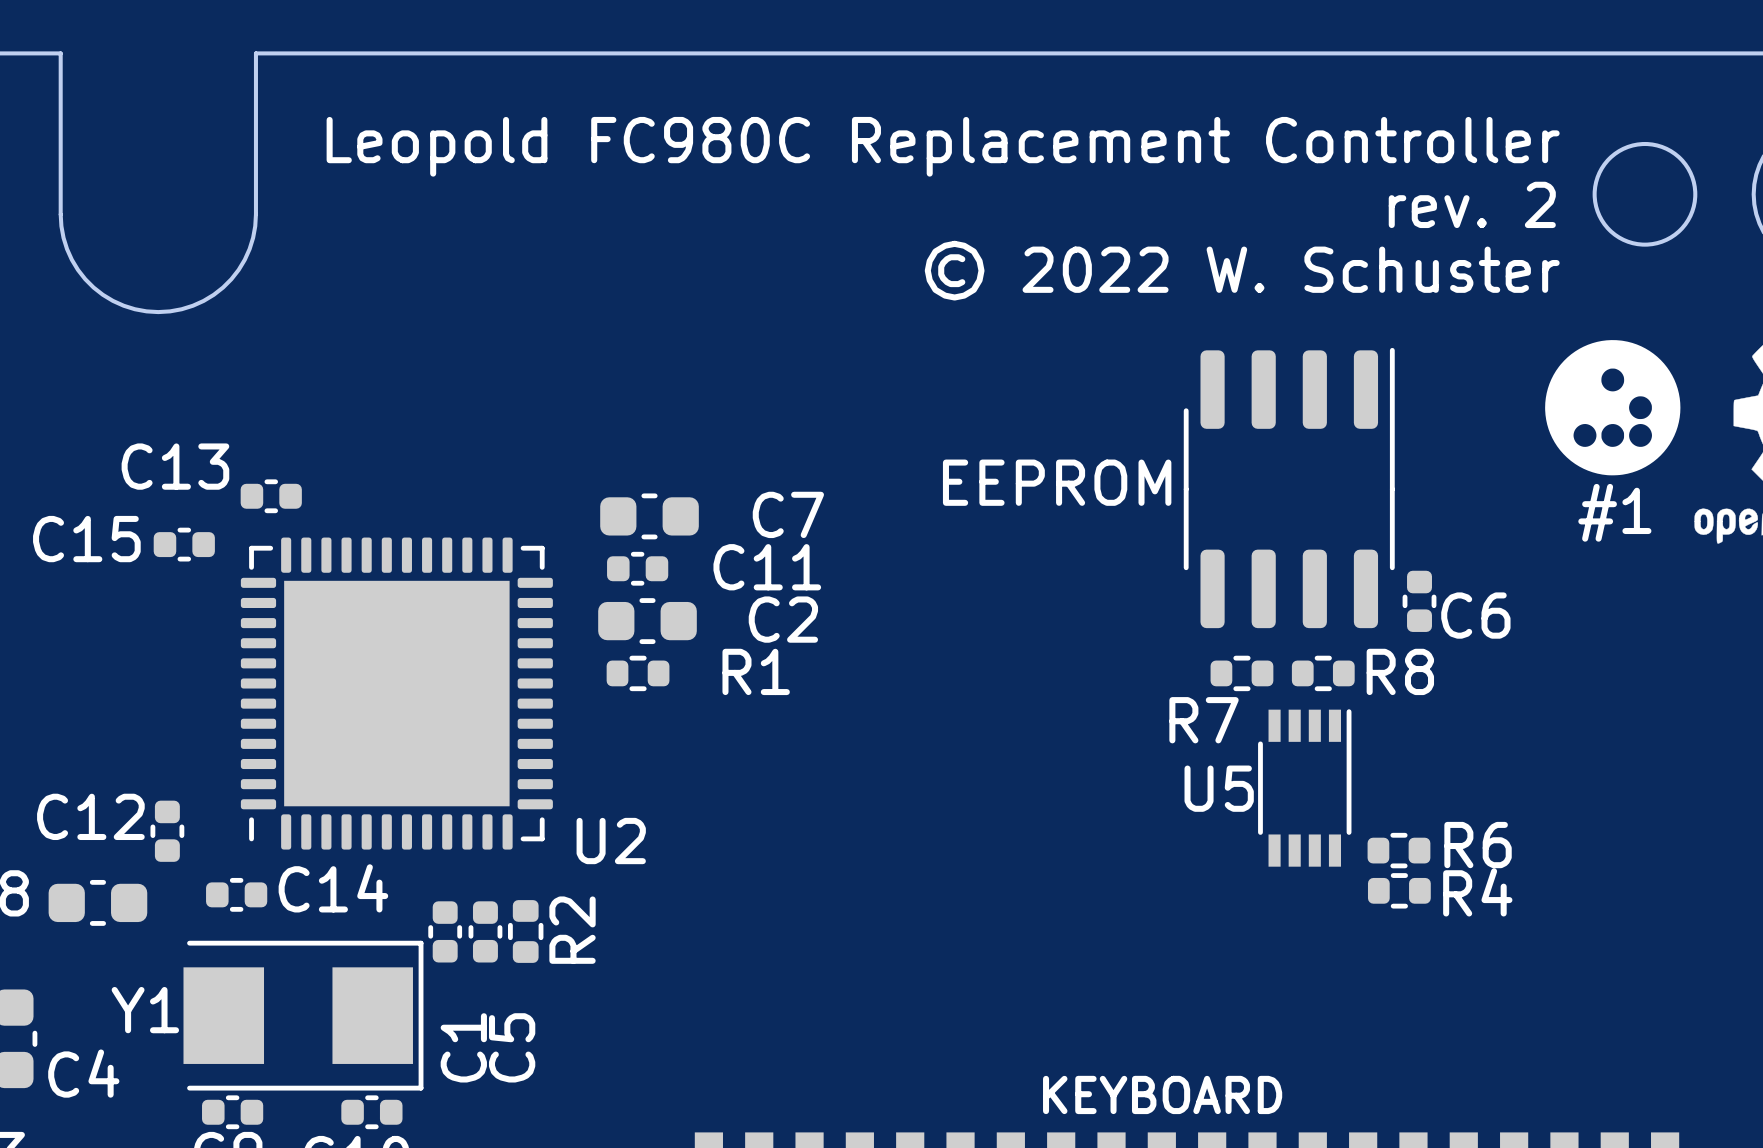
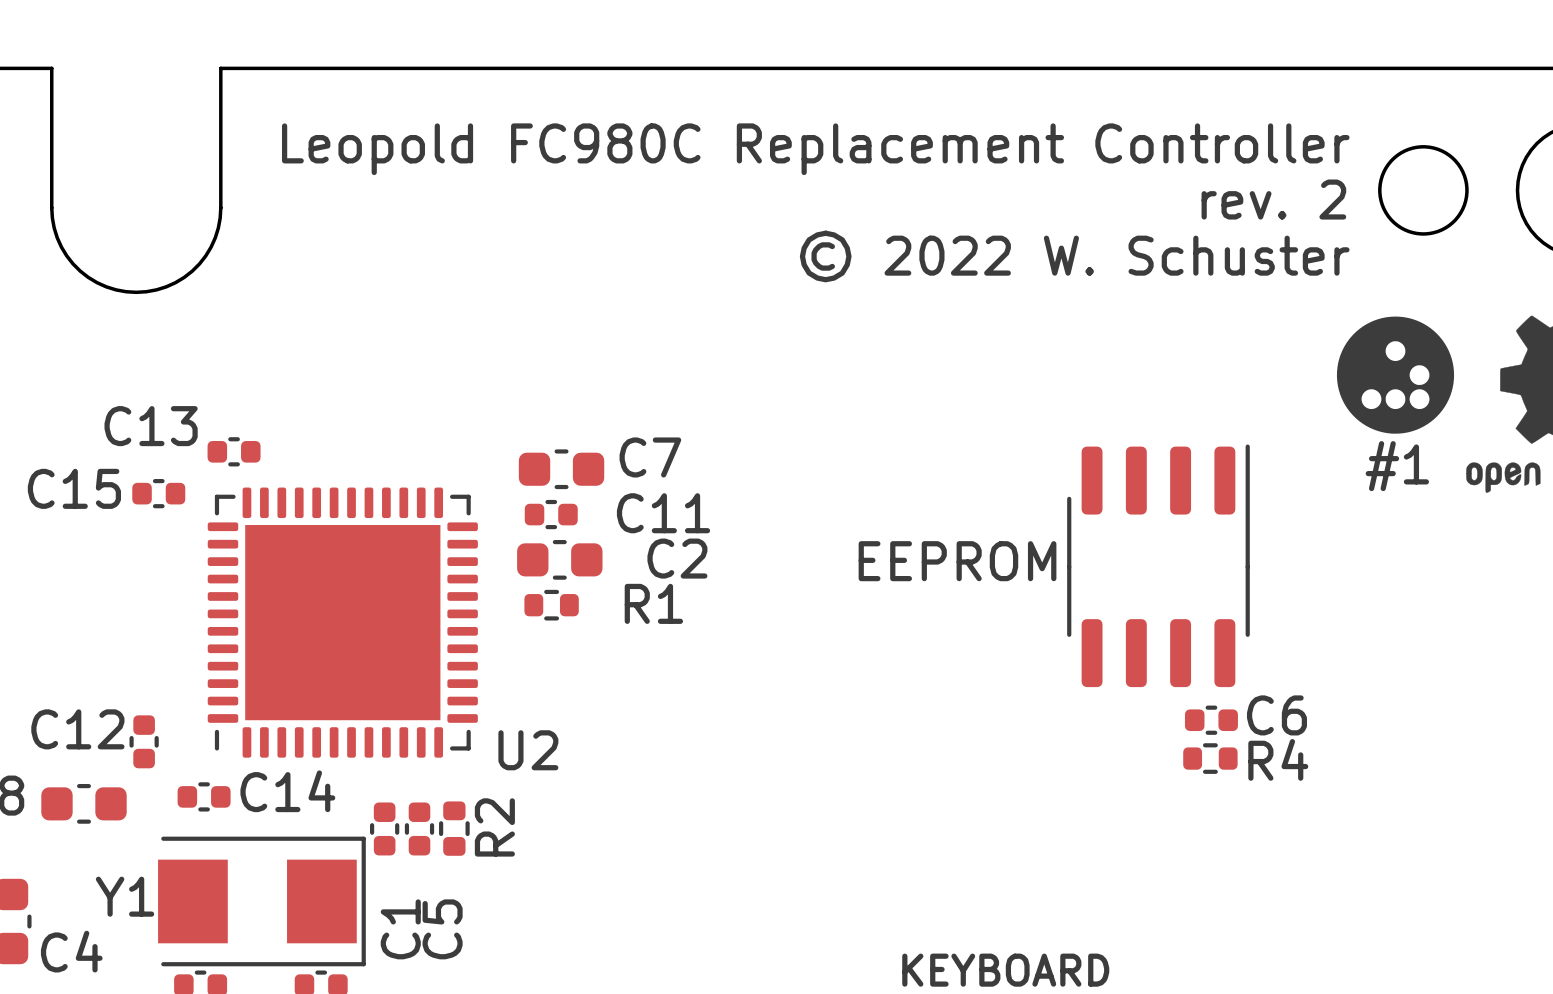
part position: (1289, 488) -> (1158, 565)
C7 name position: C7 (788, 514) -> C7 (650, 457)
C6 rotation: 0° (1419, 601) -> 90° clockwise (1211, 720)
C6 position: (1419, 601) -> (1211, 720)
R7: (1241, 673) -> none
R8: (1323, 673) -> none
U5: (1304, 787) -> none
R6 name: R6 (1478, 845) -> R4 (1278, 759)
R4: (1399, 890) -> none

